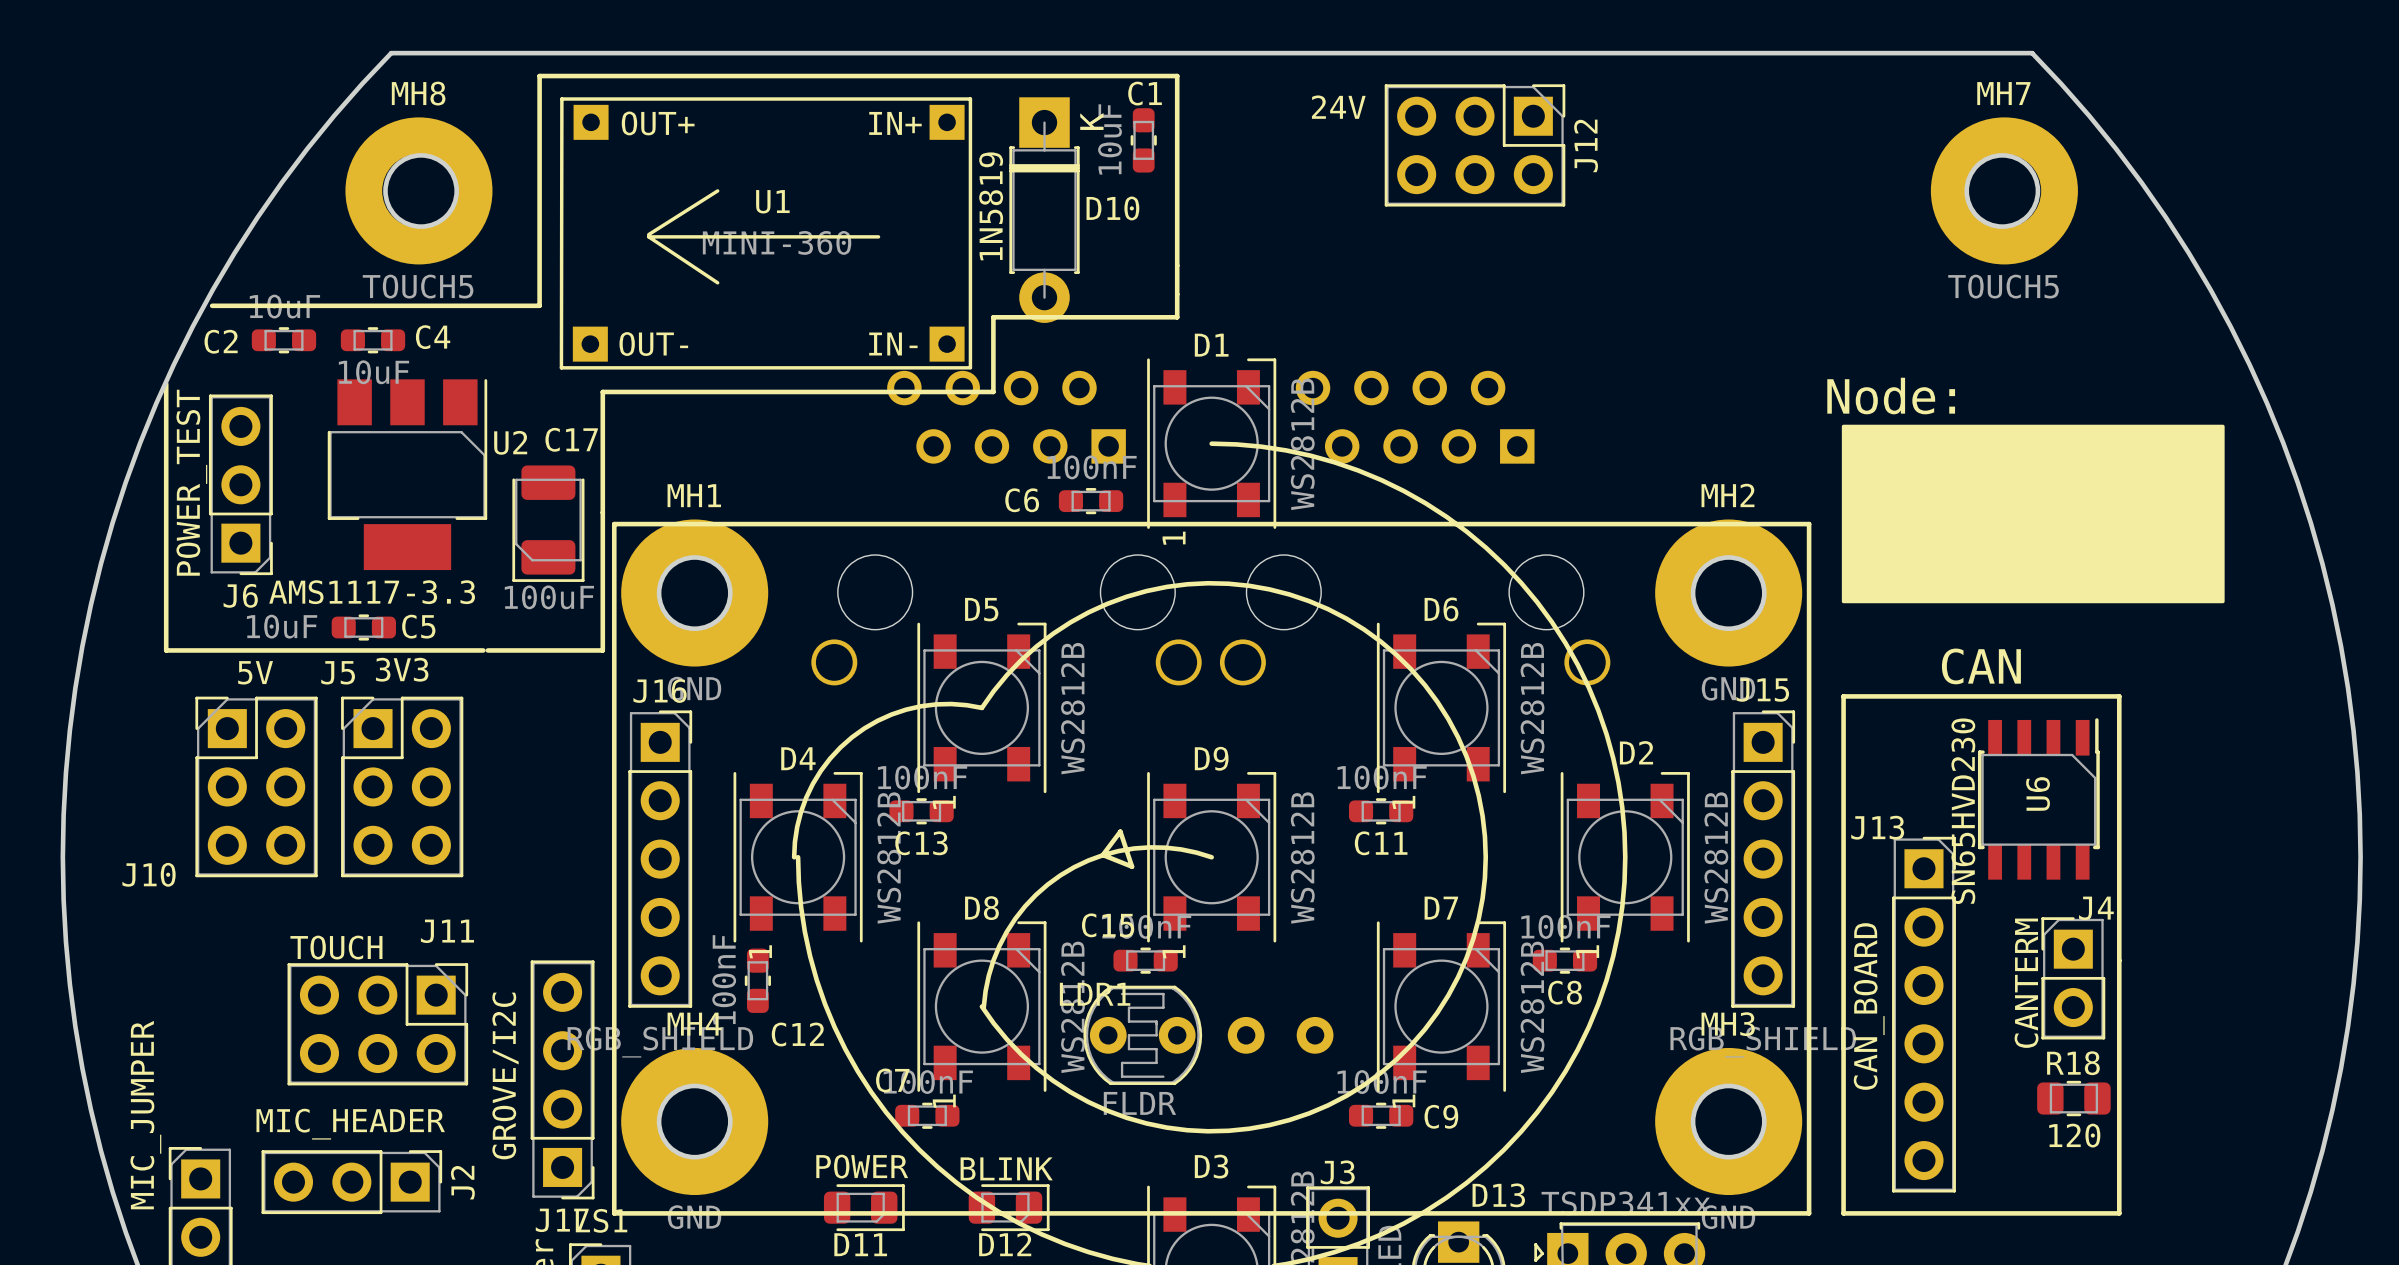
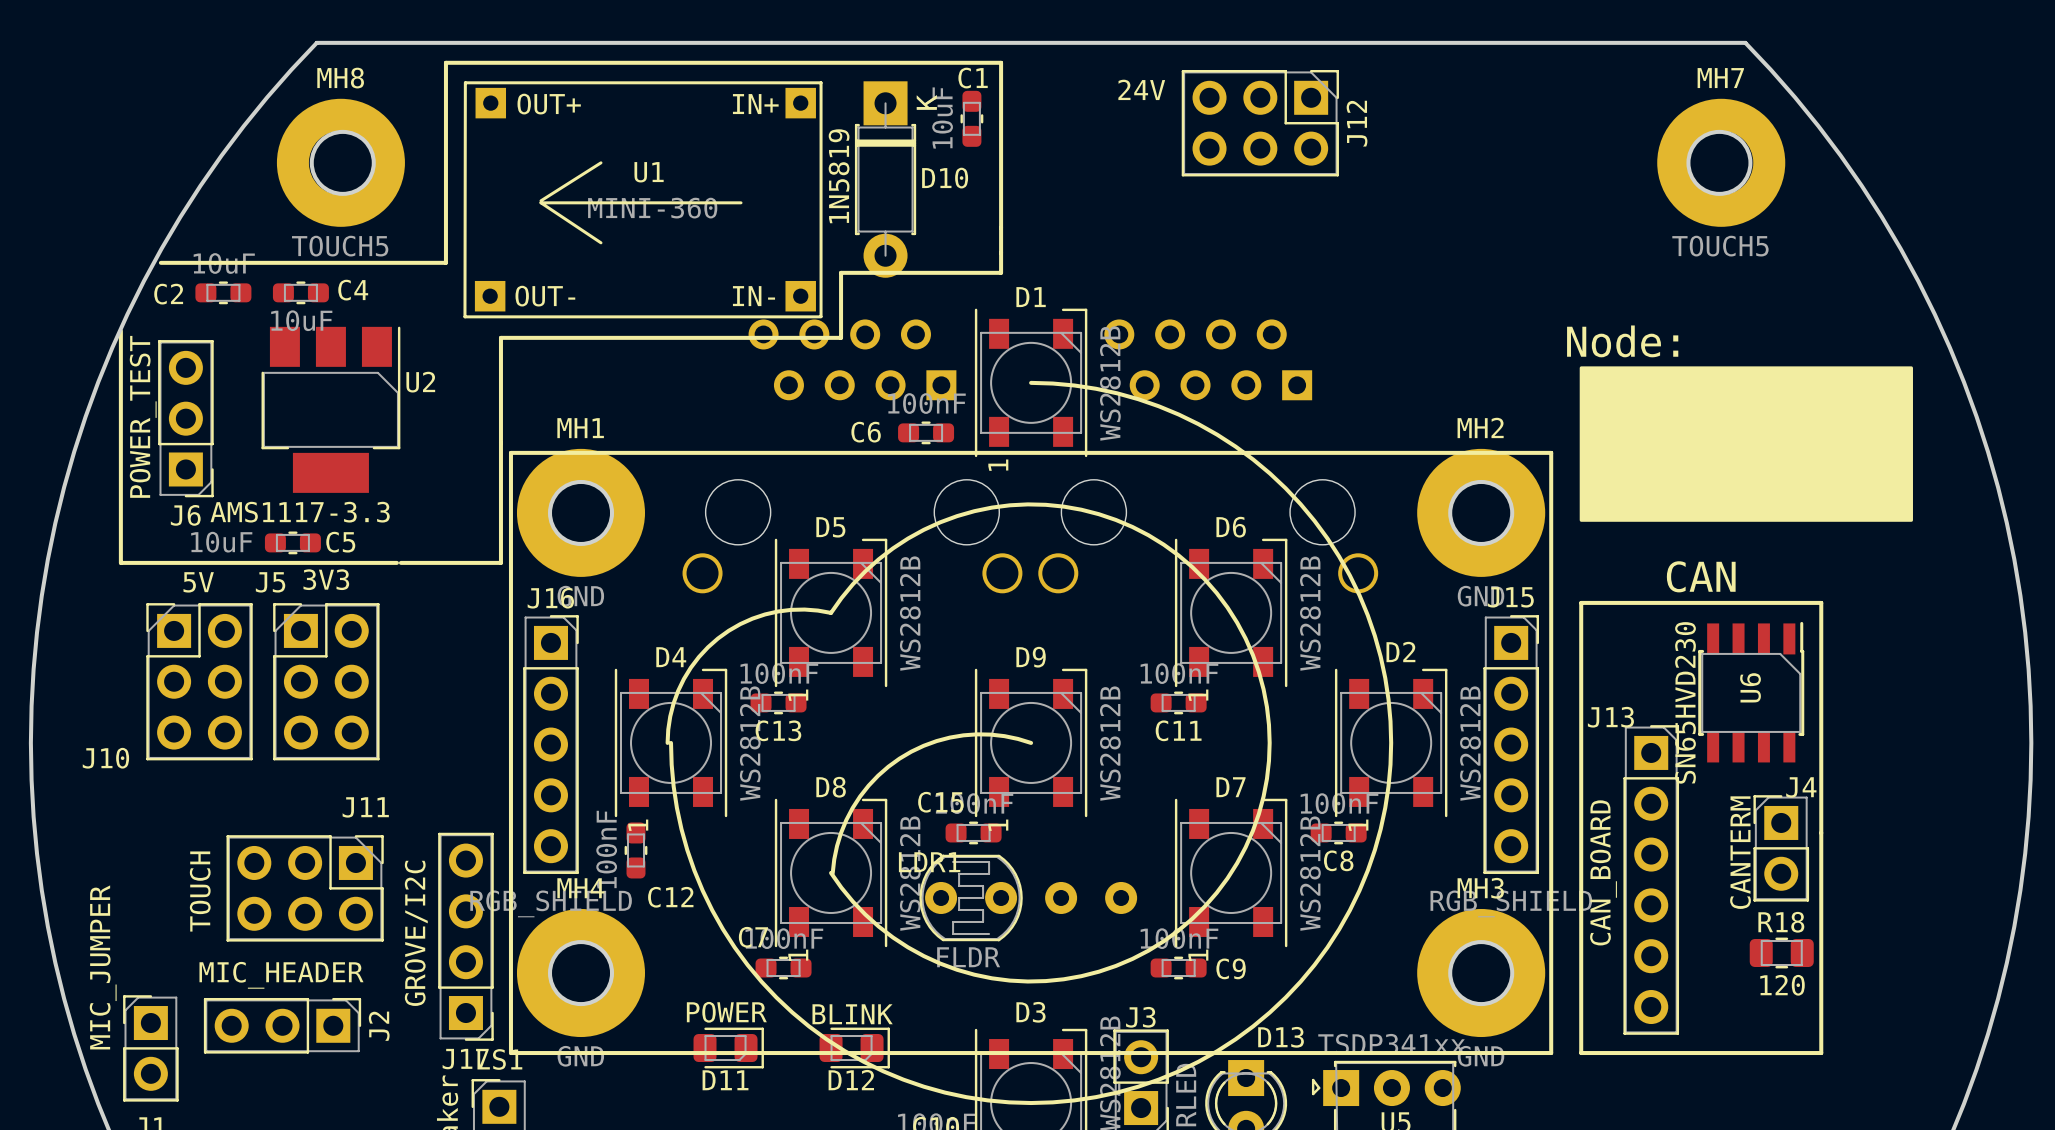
C17: 100uF (548, 523) -> none
line: (1120, 831) (1132, 866) (1102, 855) (1120, 831) -> none
J11 value rotation: 0° (336, 947) -> 90° counterclockwise (200, 891)

